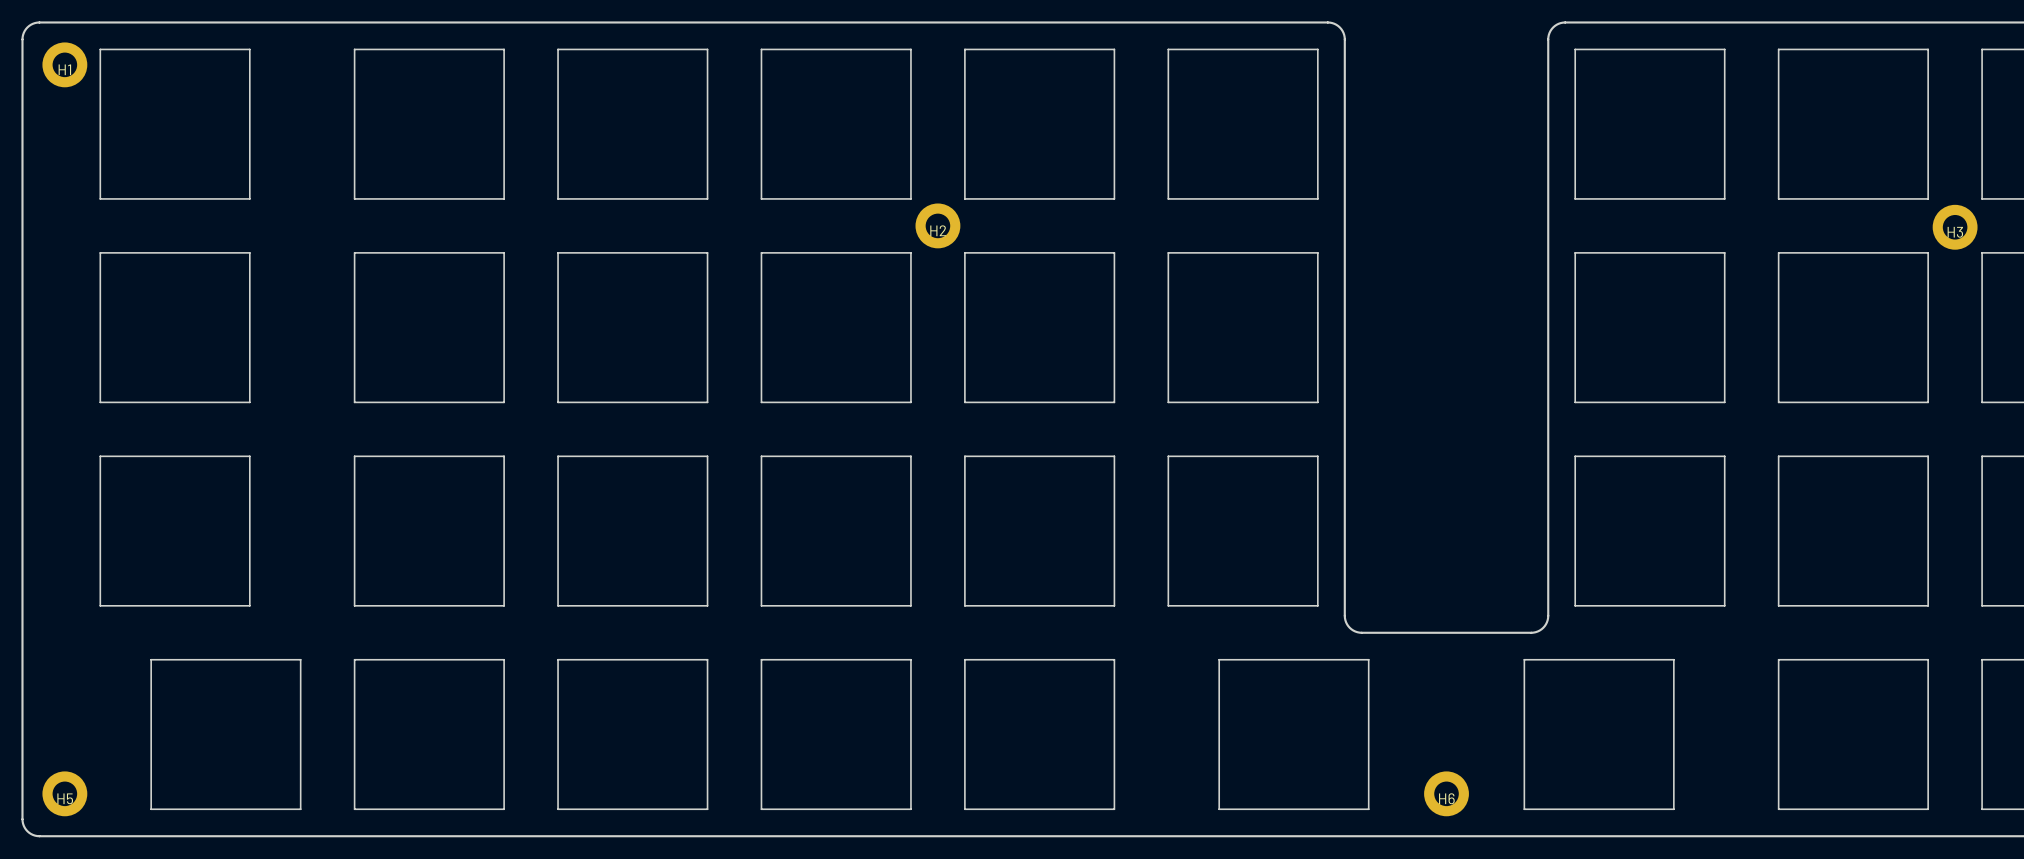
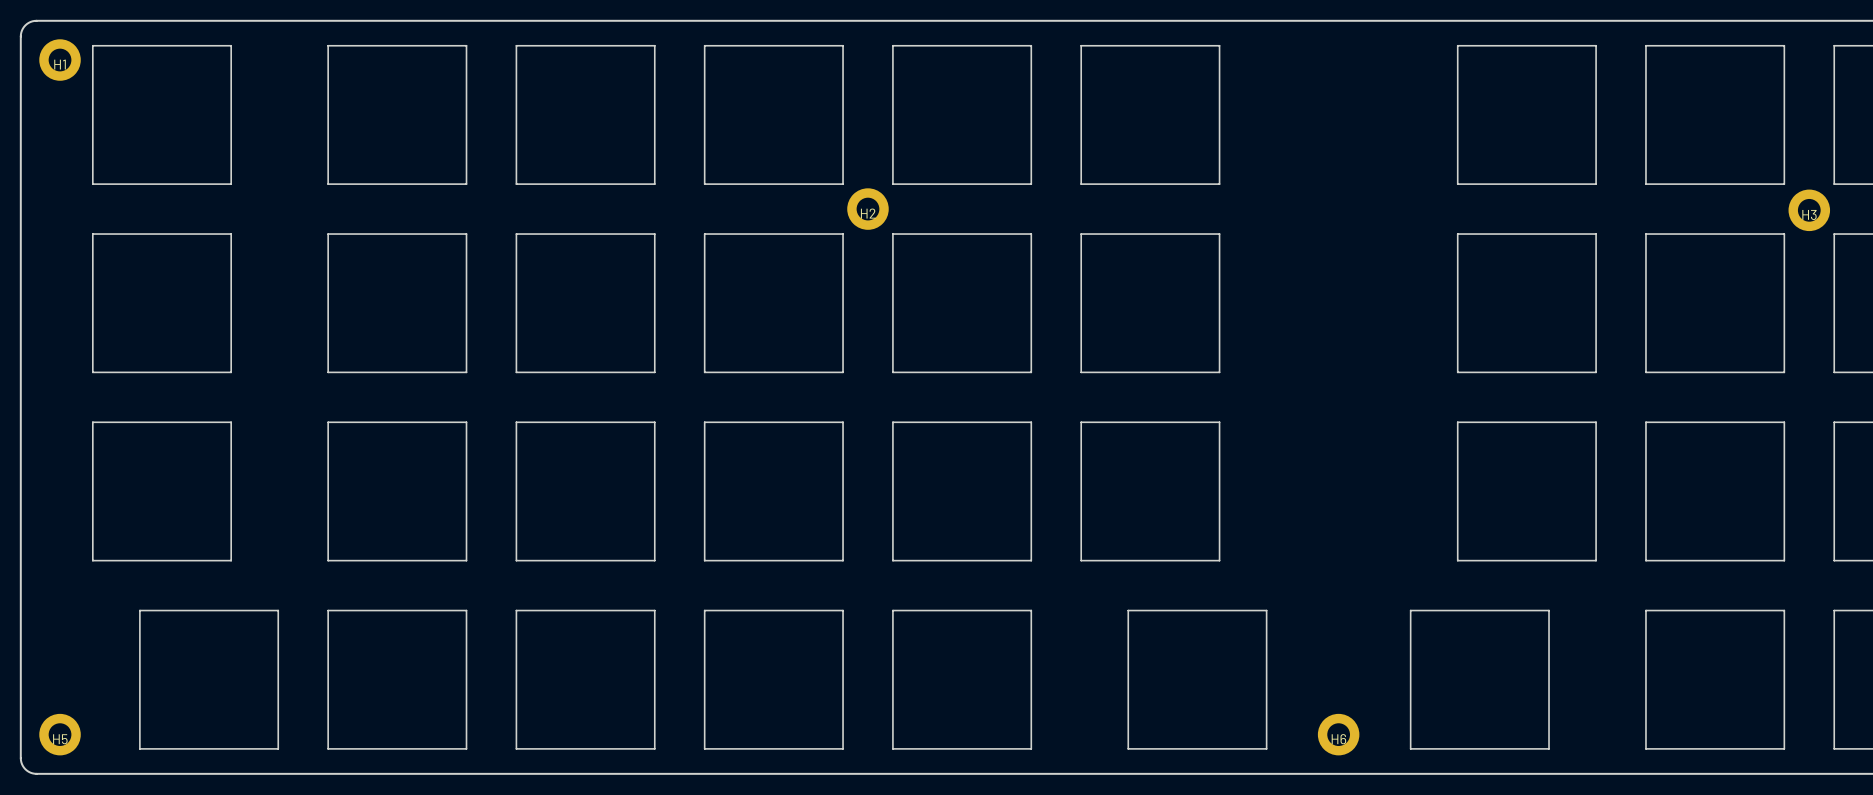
board edge: (1327, 22) (1339, 27) (1344, 39) (1344, 615) (1349, 627) (1361, 632) (1533, 632) (1541, 629) (1547, 620) (1548, 39) (1553, 27) (1565, 22) -> (1228, 20) (1448, 20)

